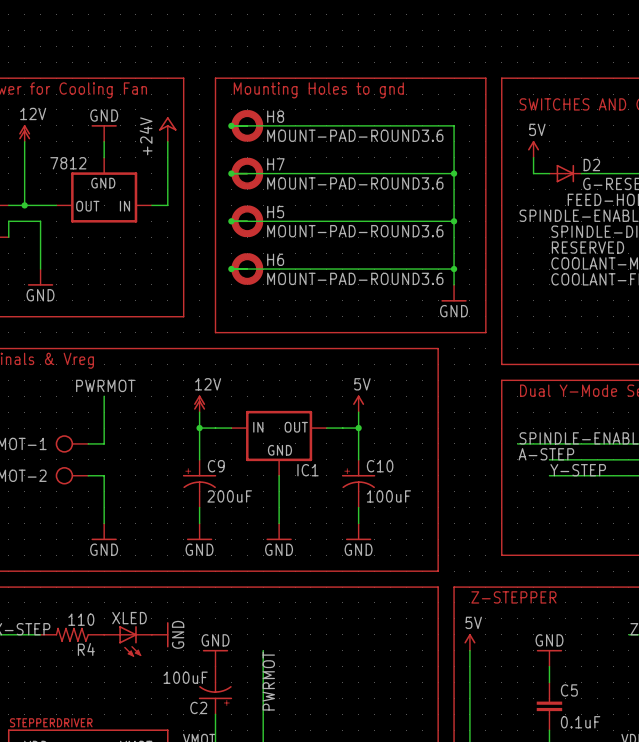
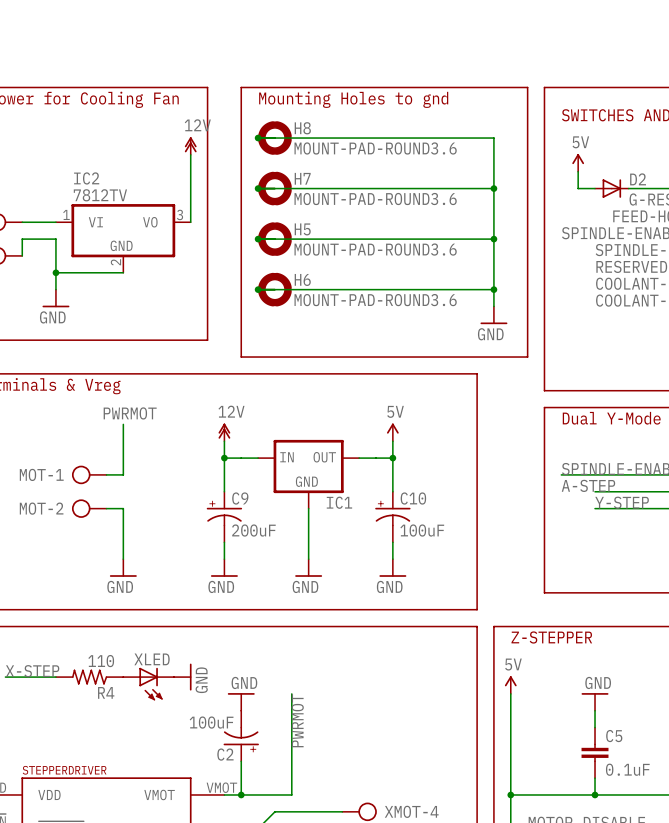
power symbol: +24V (167, 129) -> 12V (190, 146)
power symbol: 12V (24, 133) -> none
power symbol: GND (104, 133) -> none
wire: (24, 141) (24, 205) -> none
wire: (104, 141) (104, 157) -> none
7812: (104, 190) -> none
junction: (24, 205) -> none
IC2: none -> 7812TV (123, 238)
wire: none -> (55, 272) (123, 272)
junction: none -> (55, 272)

